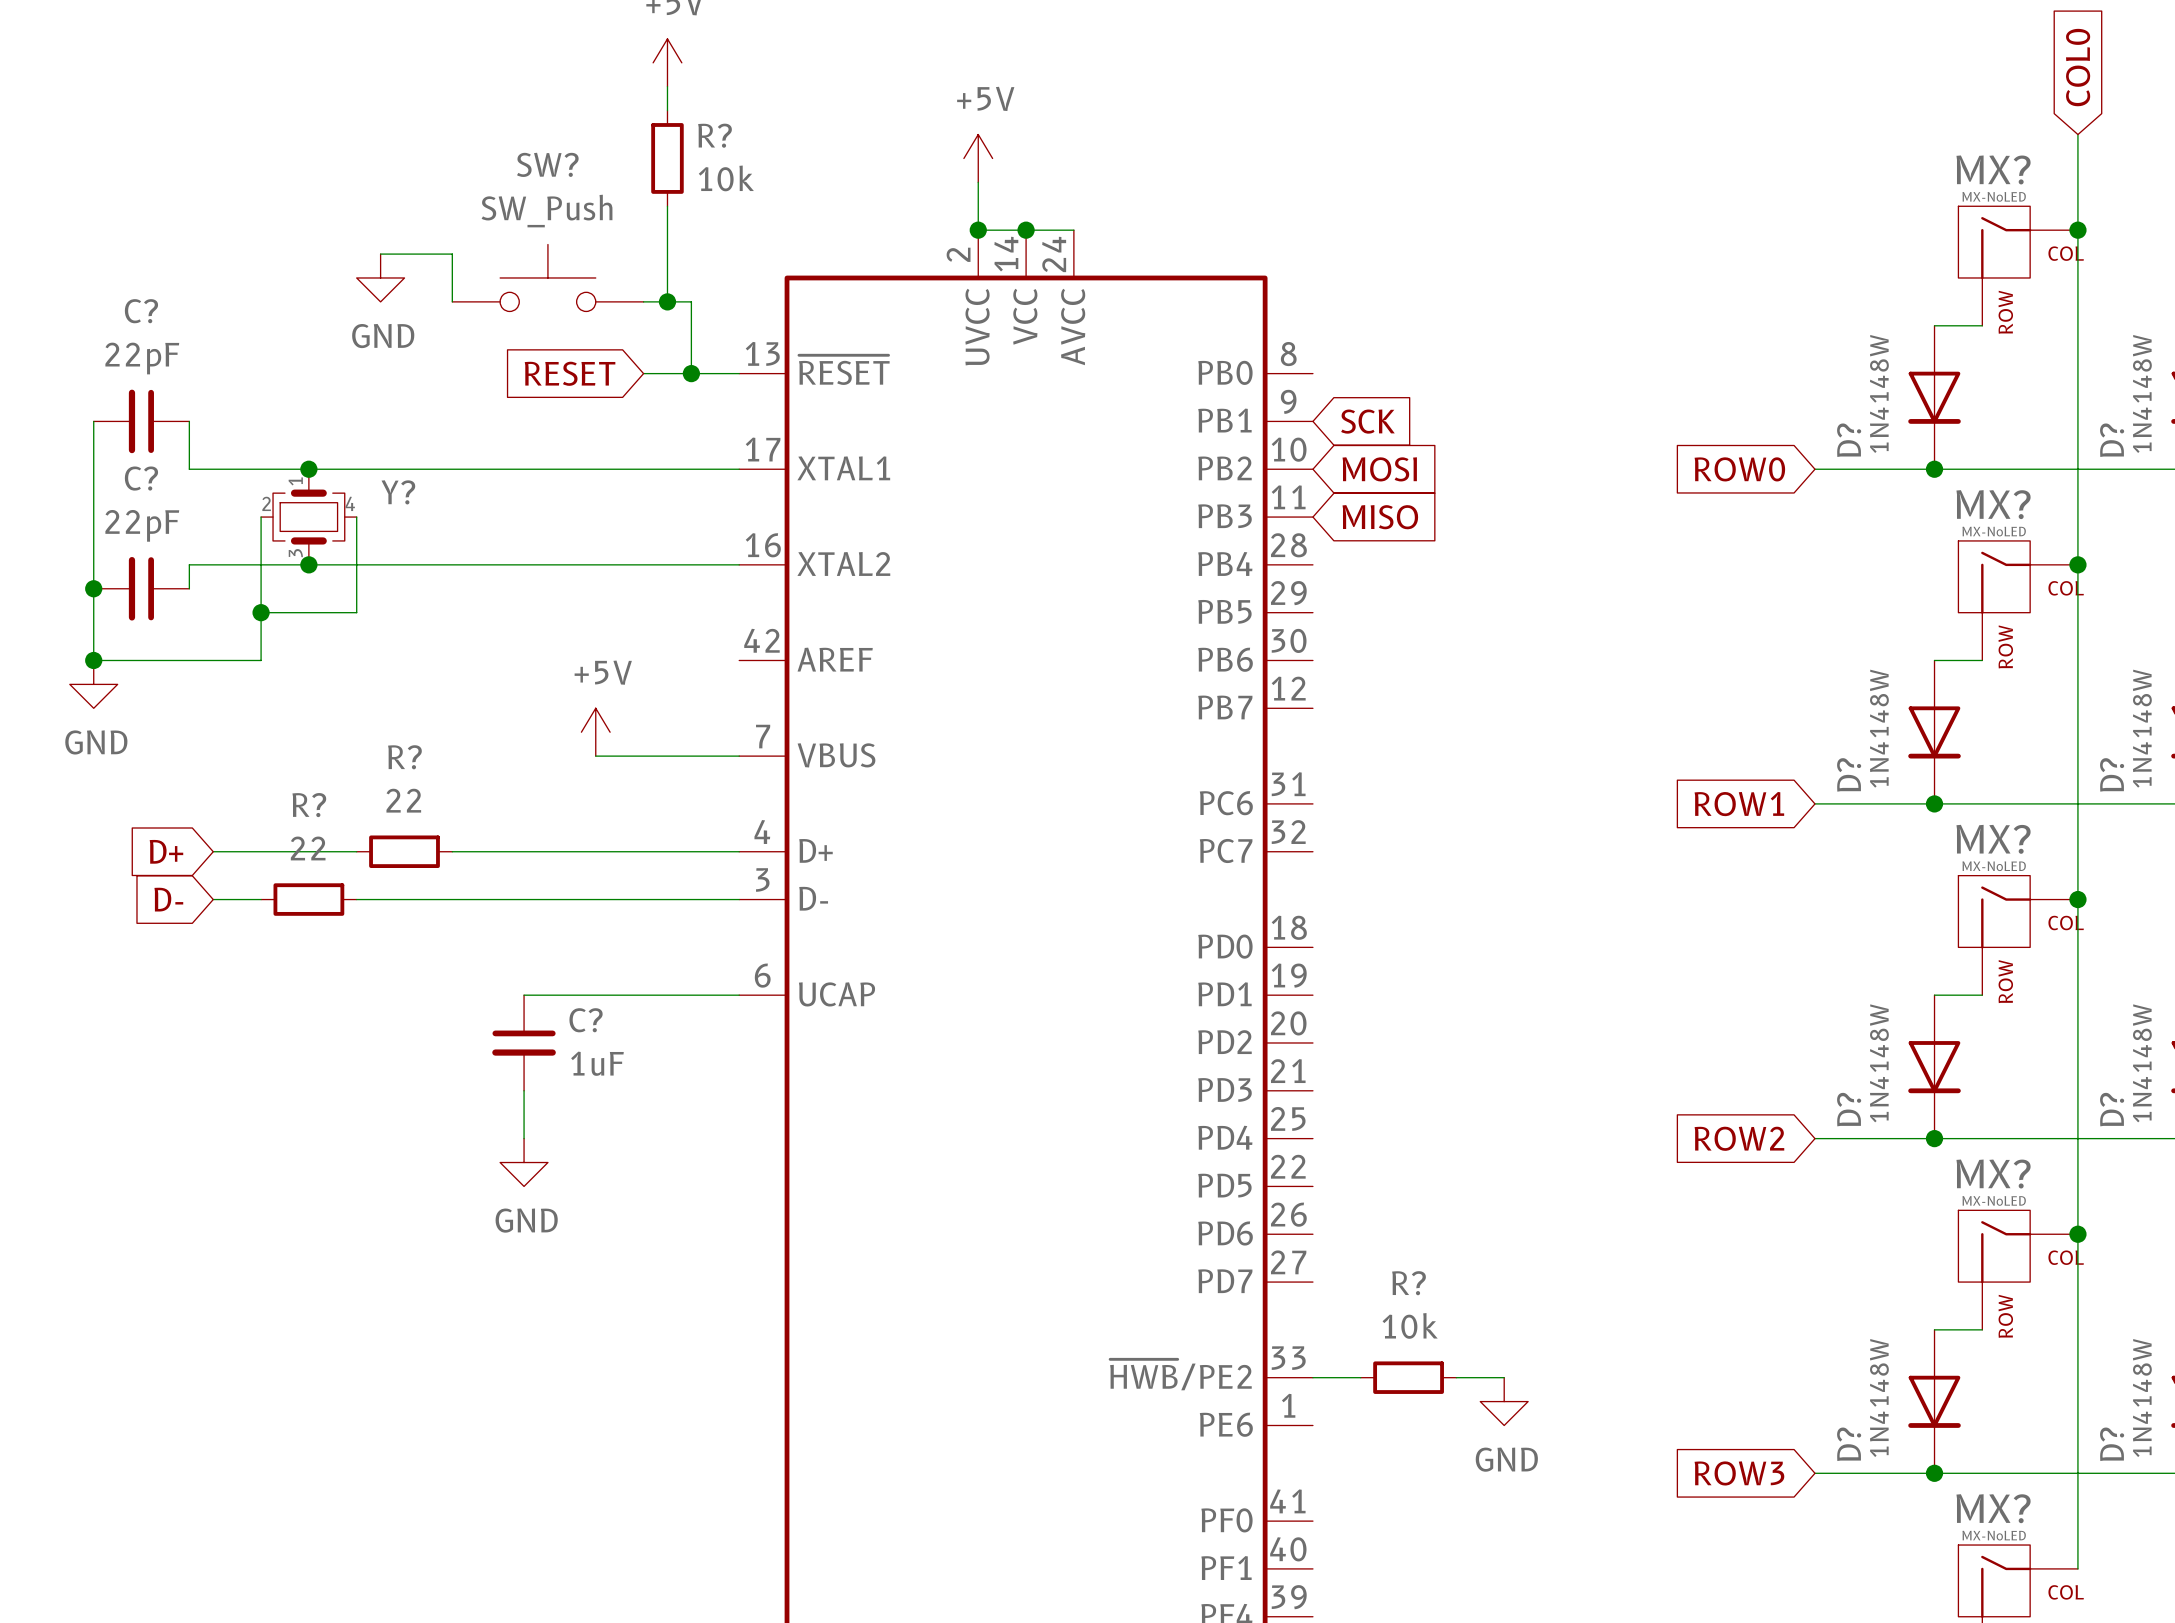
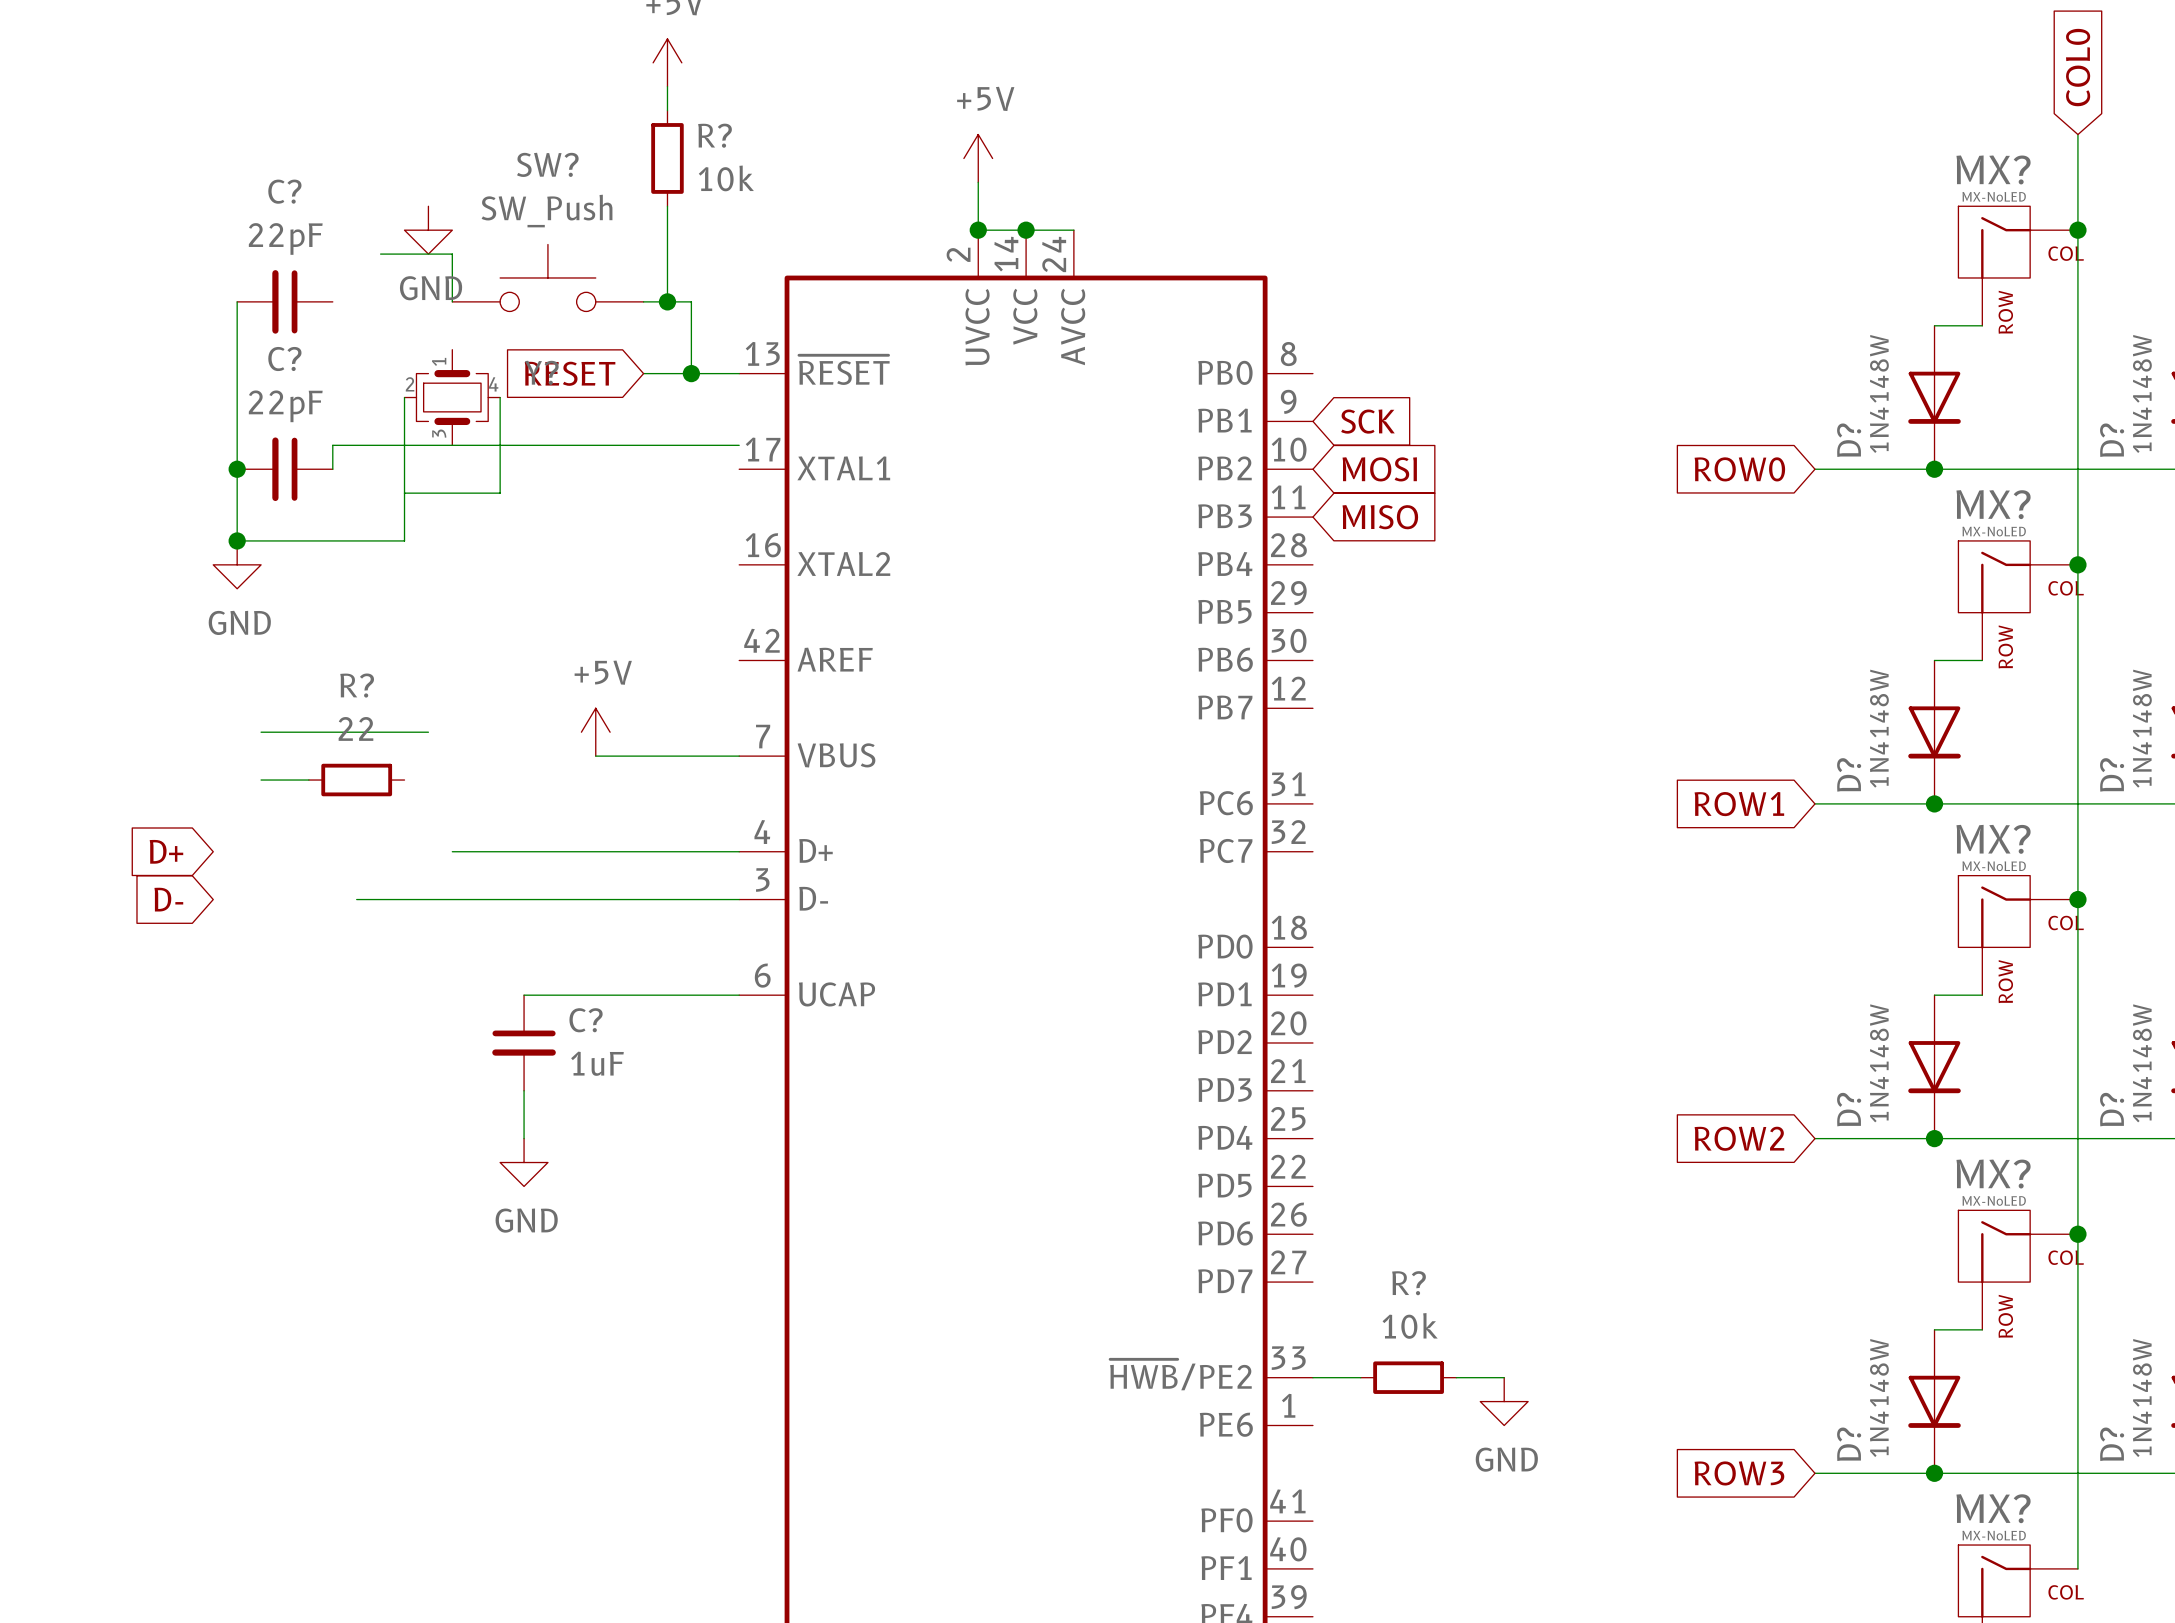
power symbol position: GND (380, 277) -> GND (428, 230)
C?: none -> 22pF (284, 301)
wire: (93, 421) (93, 660) (261, 660) (261, 517) -> (237, 301) (237, 540) (404, 540) (404, 397)
C?: 22pF (141, 421) -> none
wire: (189, 421) (189, 469) (739, 469) -> none
wire: none -> (739, 445) (332, 445) (332, 469)
junction: none -> (237, 469)
C?: none -> 22pF (284, 469)
junction: (308, 469) -> none
Y? position: (308, 517) -> (452, 397)
wire: (356, 517) (356, 612) (261, 612) -> (500, 397) (500, 493) (404, 493)
junction: none -> (237, 540)
power symbol: none -> GND (237, 564)
junction: (308, 564) -> none
wire: (739, 564) (189, 564) (189, 588) -> none
junction: (93, 588) -> none
C?: 22pF (141, 588) -> none
junction: (261, 612) -> none
junction: (93, 660) -> none
power symbol: GND (93, 684) -> none
wire: none -> (261, 732) (428, 732)
R?: none -> 22 (356, 780)
wire: (213, 851) (356, 851) -> none
R?: 22 (404, 851) -> none
wire: (213, 899) (261, 899) -> (261, 780) (308, 780)
R?: 22 (308, 899) -> none

